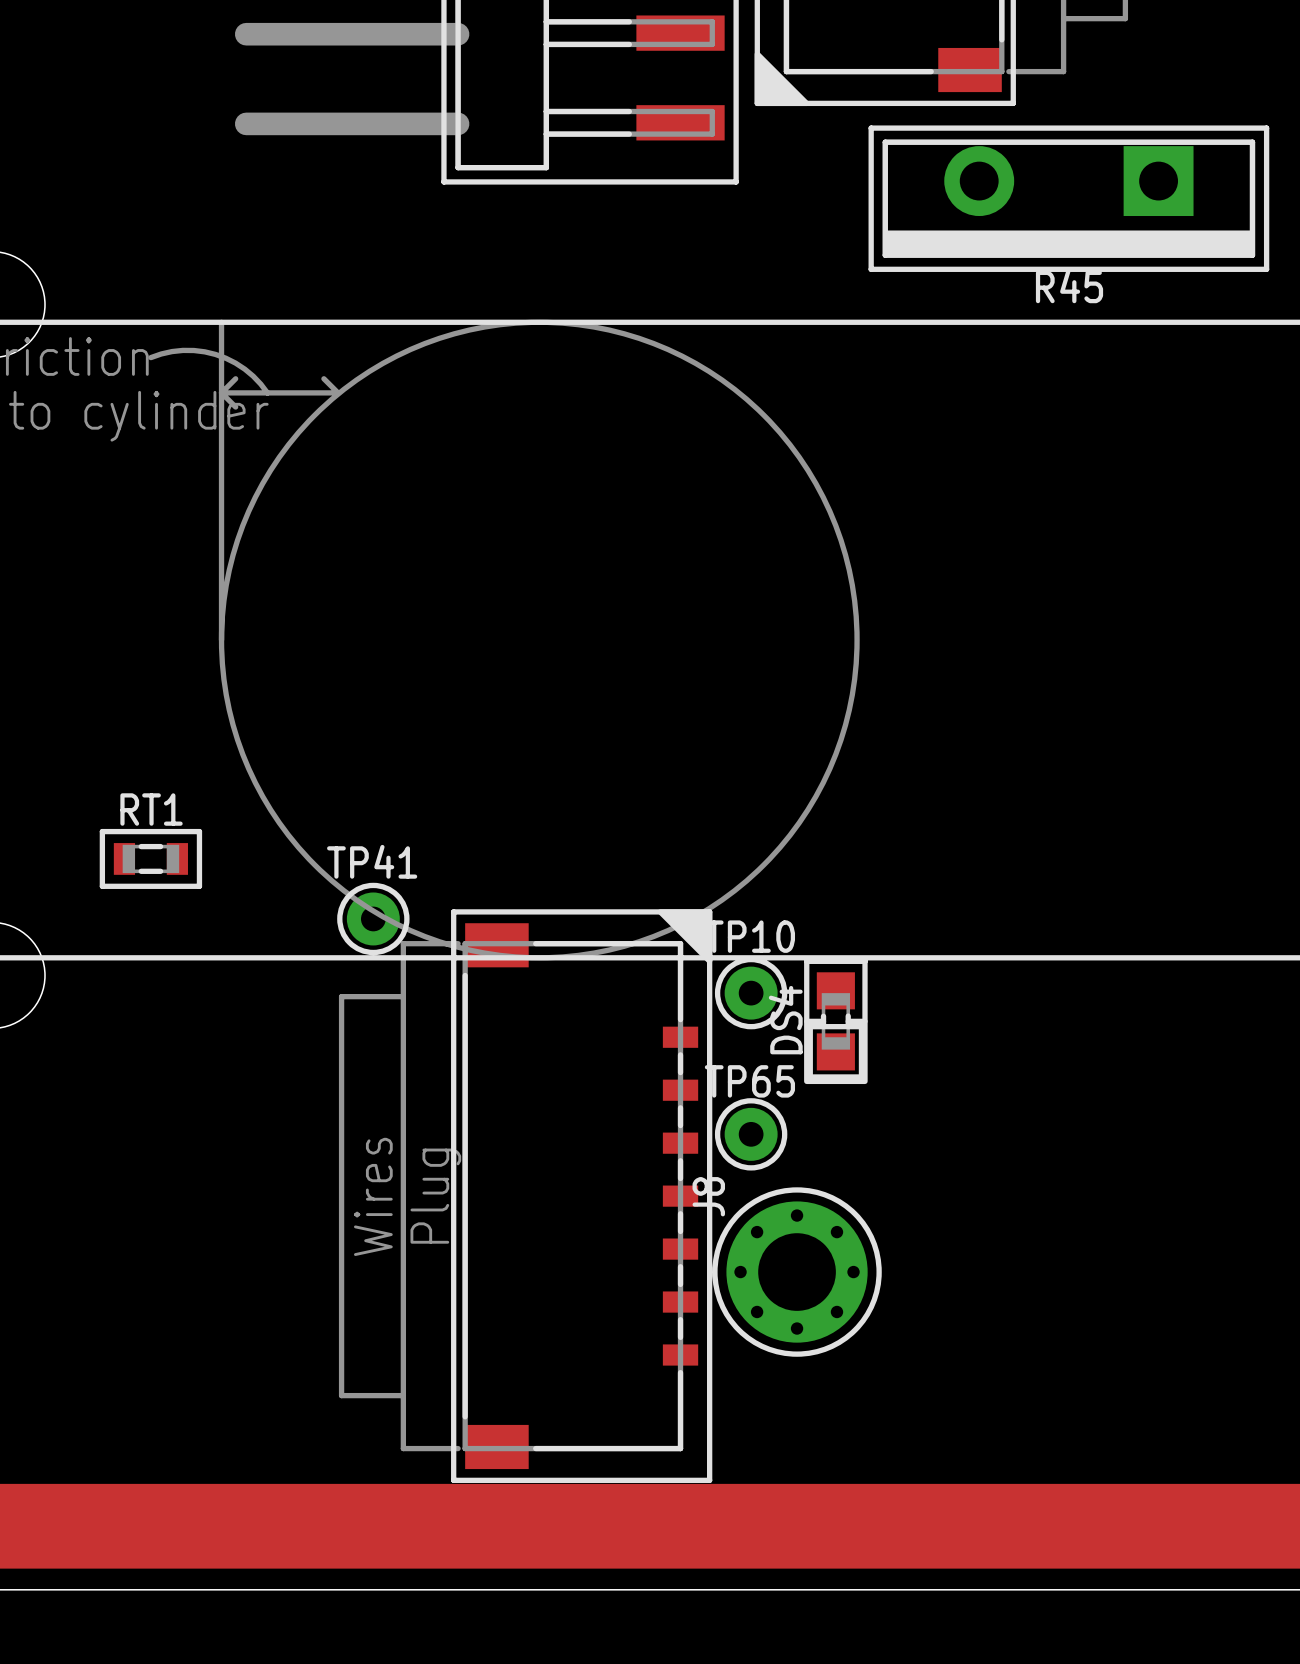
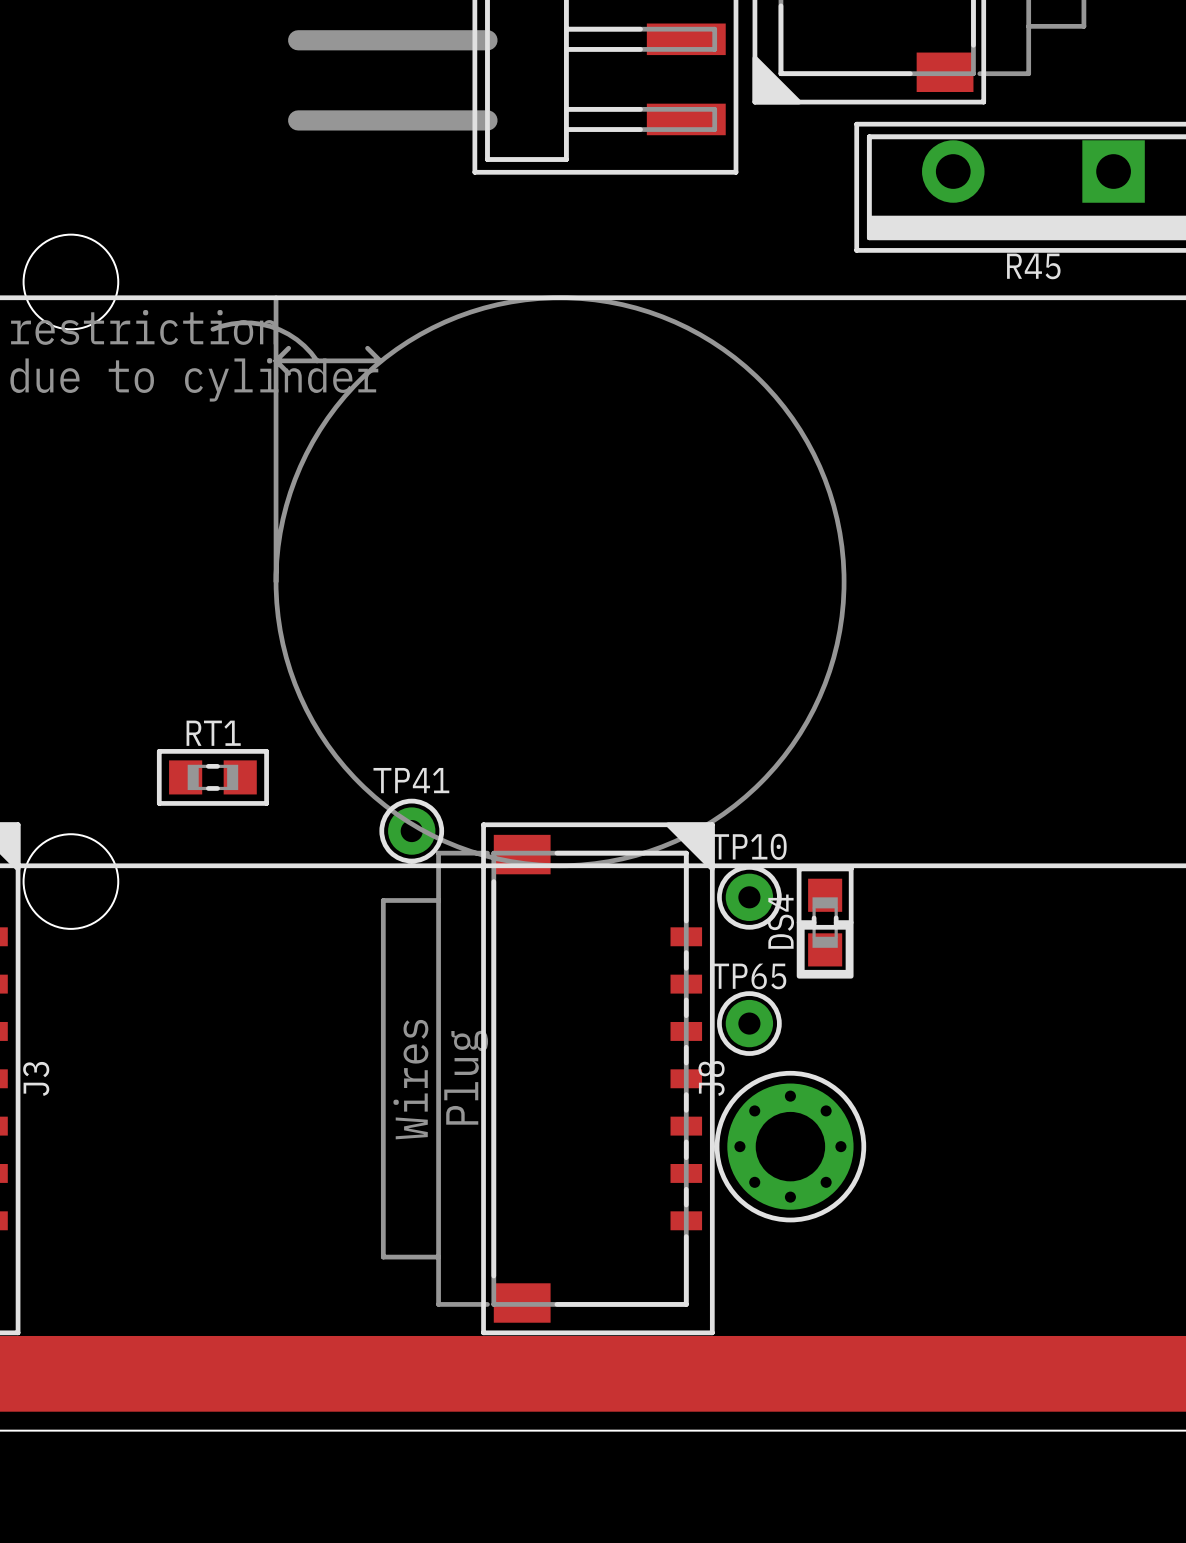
RT1 footprint: [99, 828, 203, 889] -> [156, 749, 269, 806]

